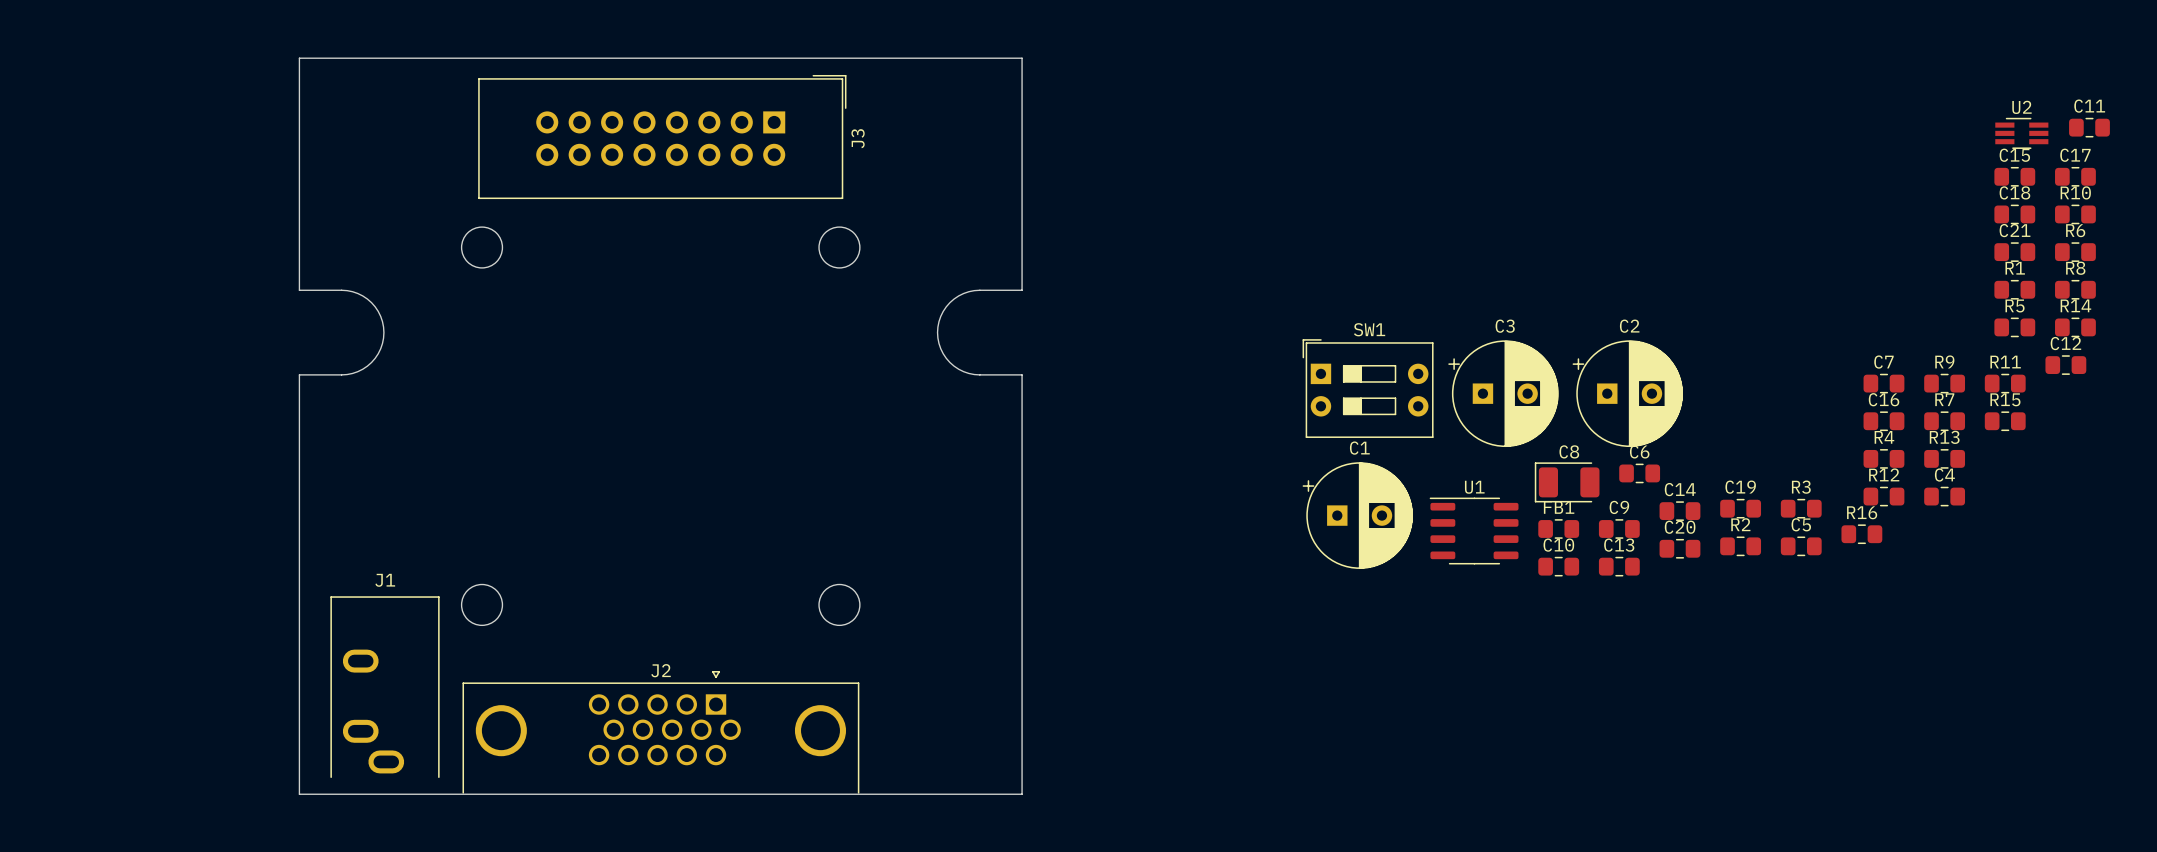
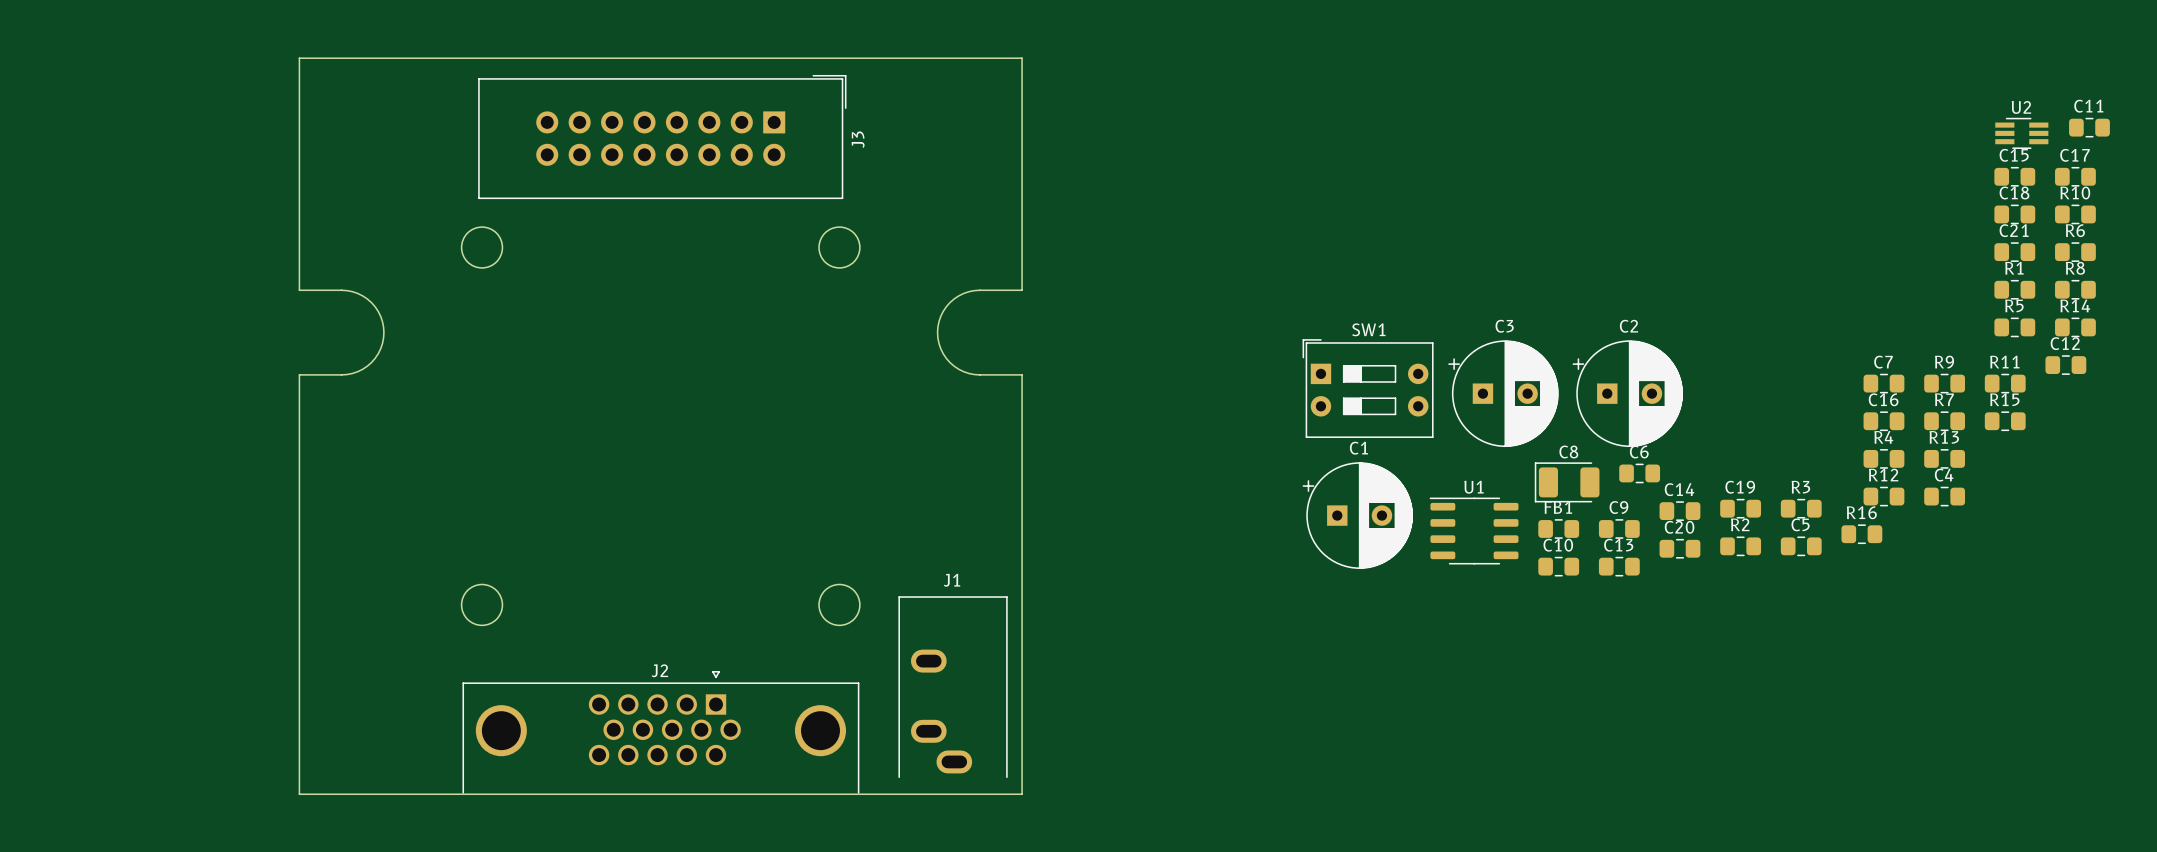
J1 position: (385, 687) -> (953, 687)

